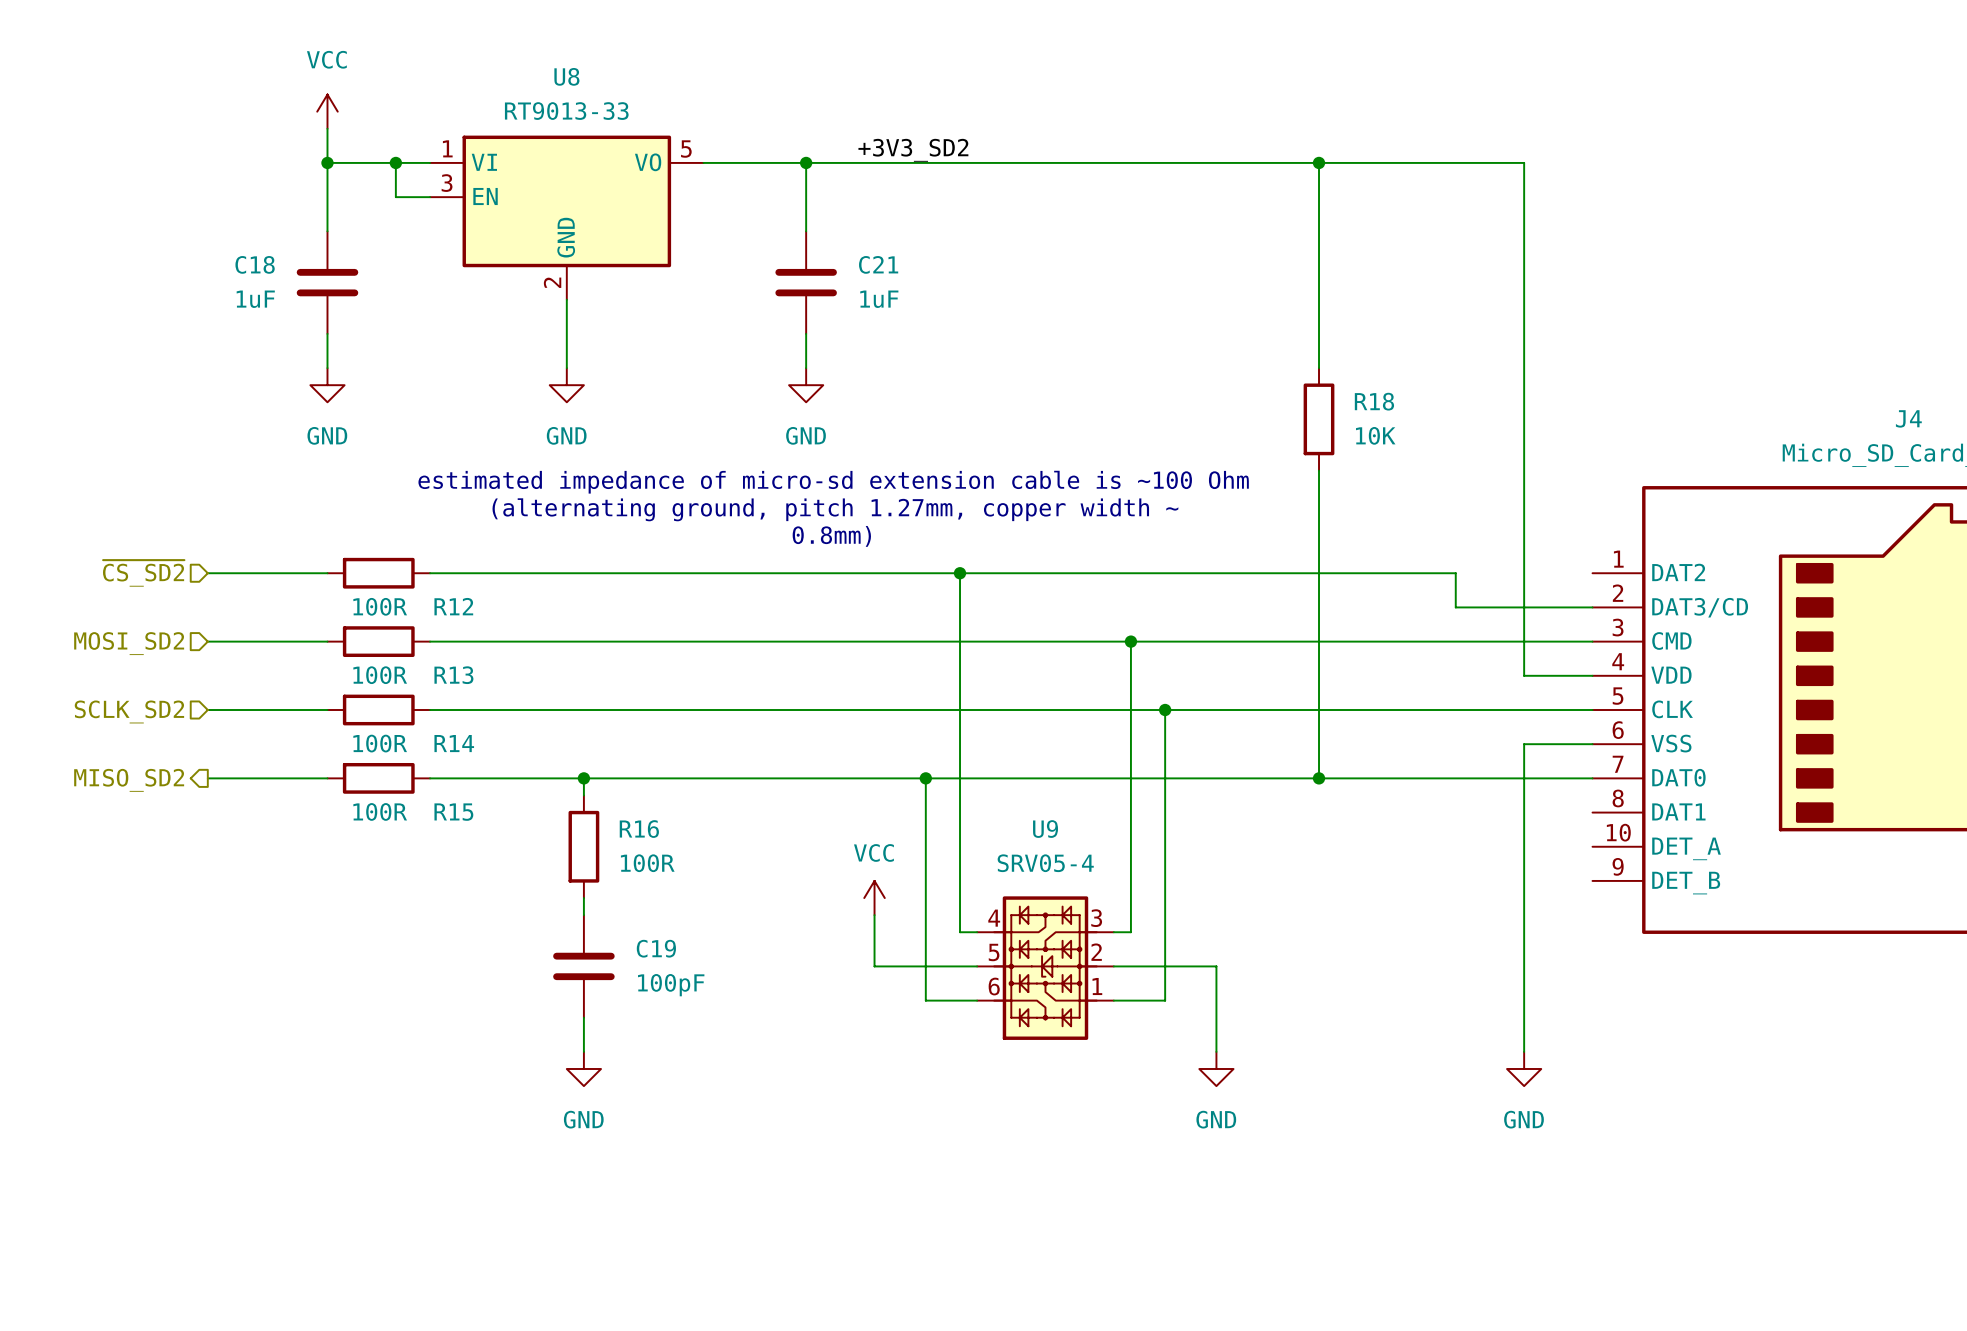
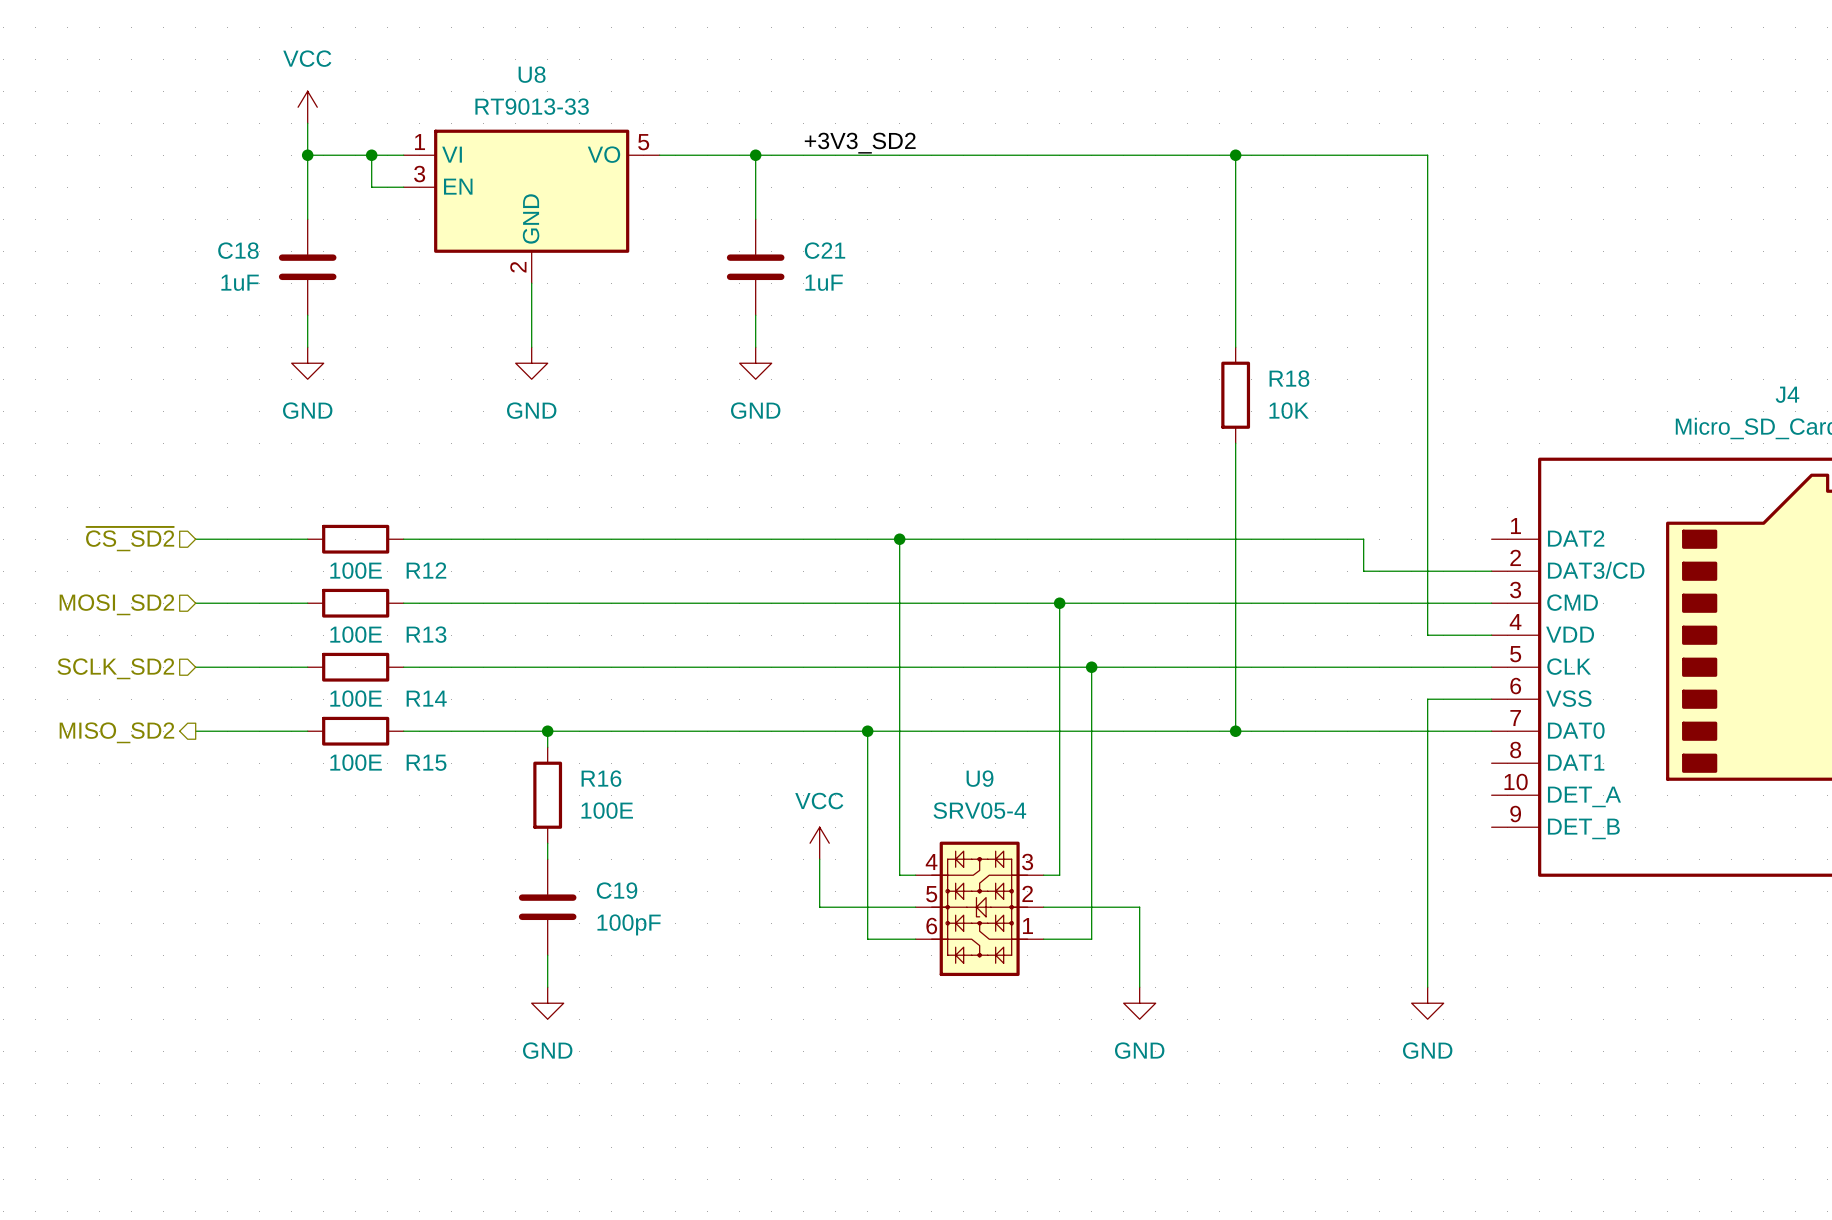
text: estimated impedance of micro-sd extension cable is ~100 Ohm (833, 482) -> none
text: (alternating ground, pitch 1.27mm, copper width ~ (835, 509) -> none
text: 0.8mm) (831, 536) -> none
R12 value: 100R (380, 606) -> 100E (356, 570)
R13 value: 100R (380, 675) -> 100E (356, 634)
R14 value: 100R (380, 743) -> 100E (356, 698)
R15 value: 100R (380, 811) -> 100E (356, 762)
R16 value: 100R (647, 863) -> 100E (607, 810)

